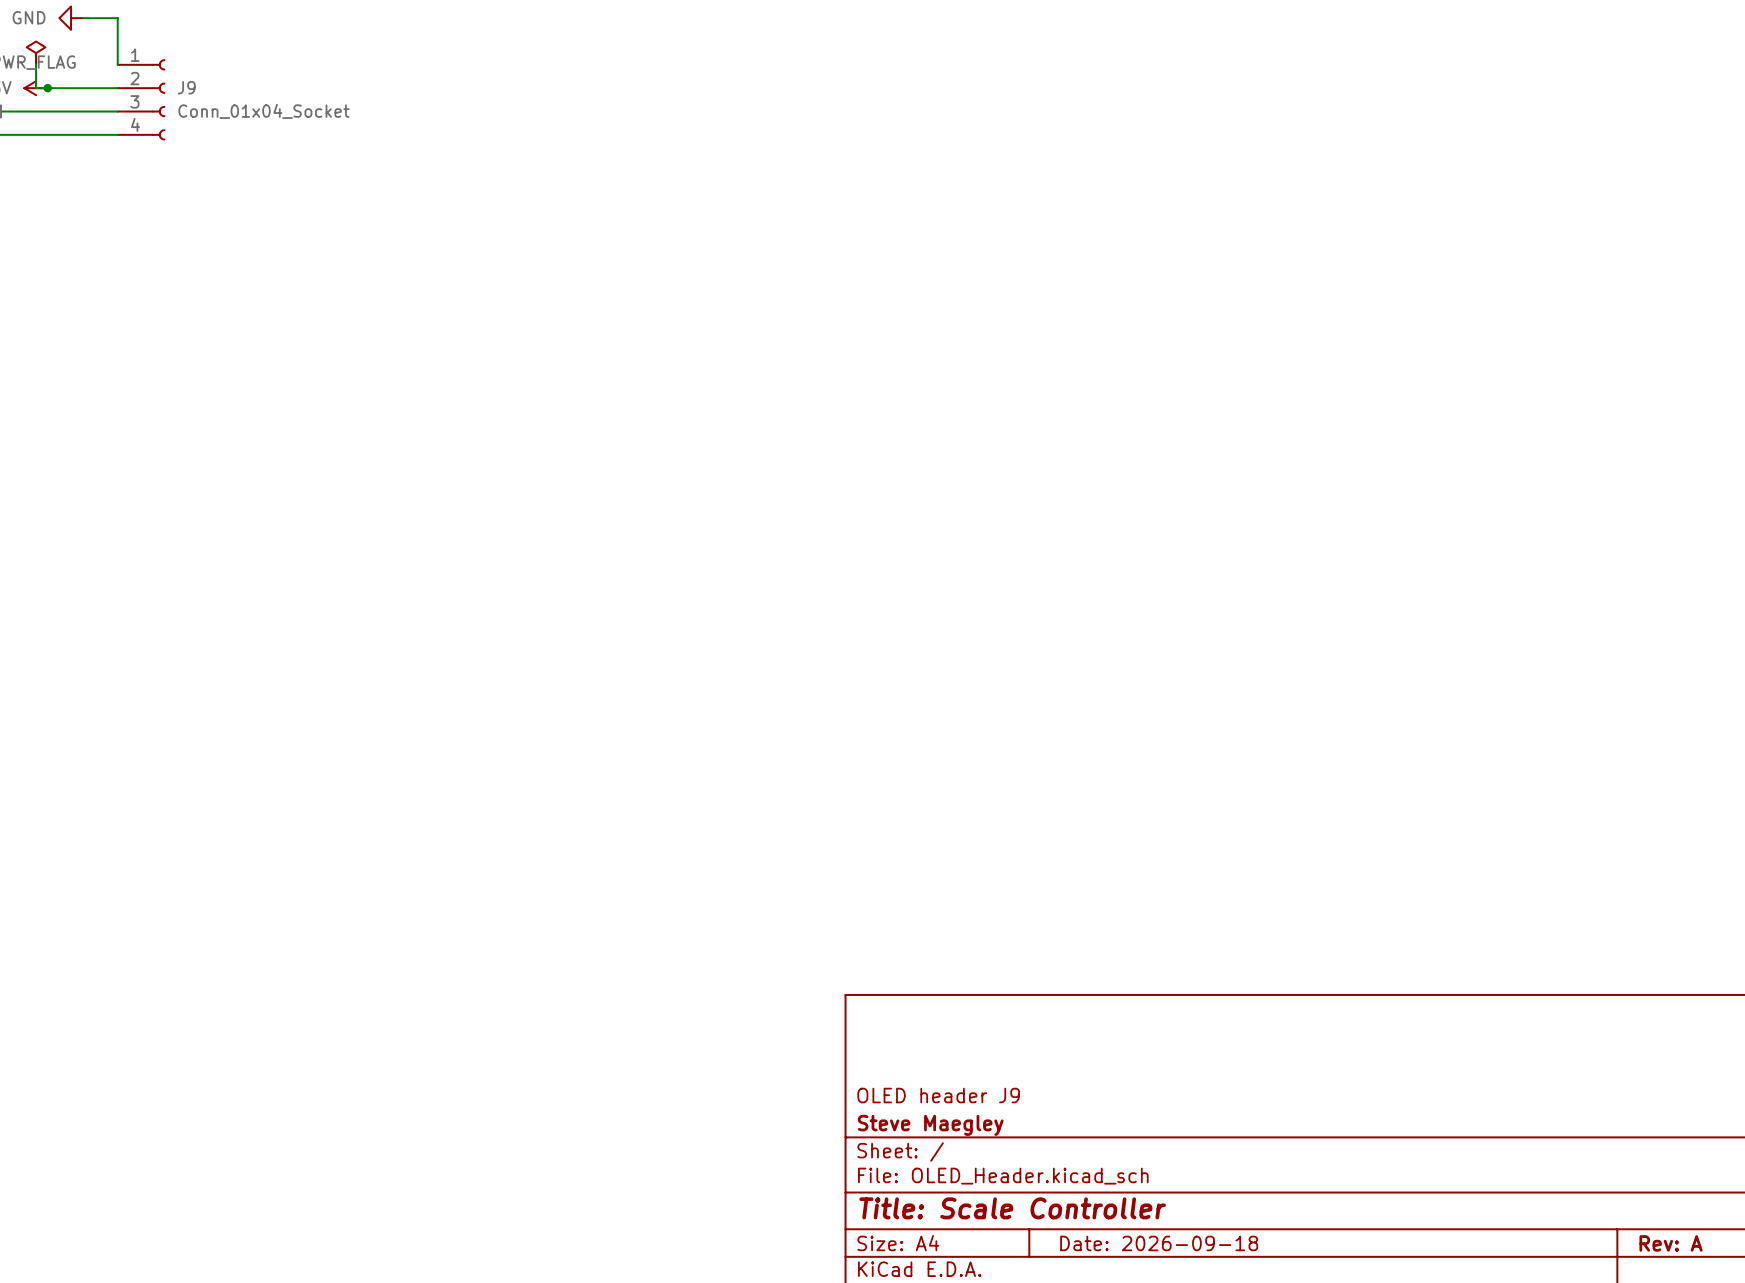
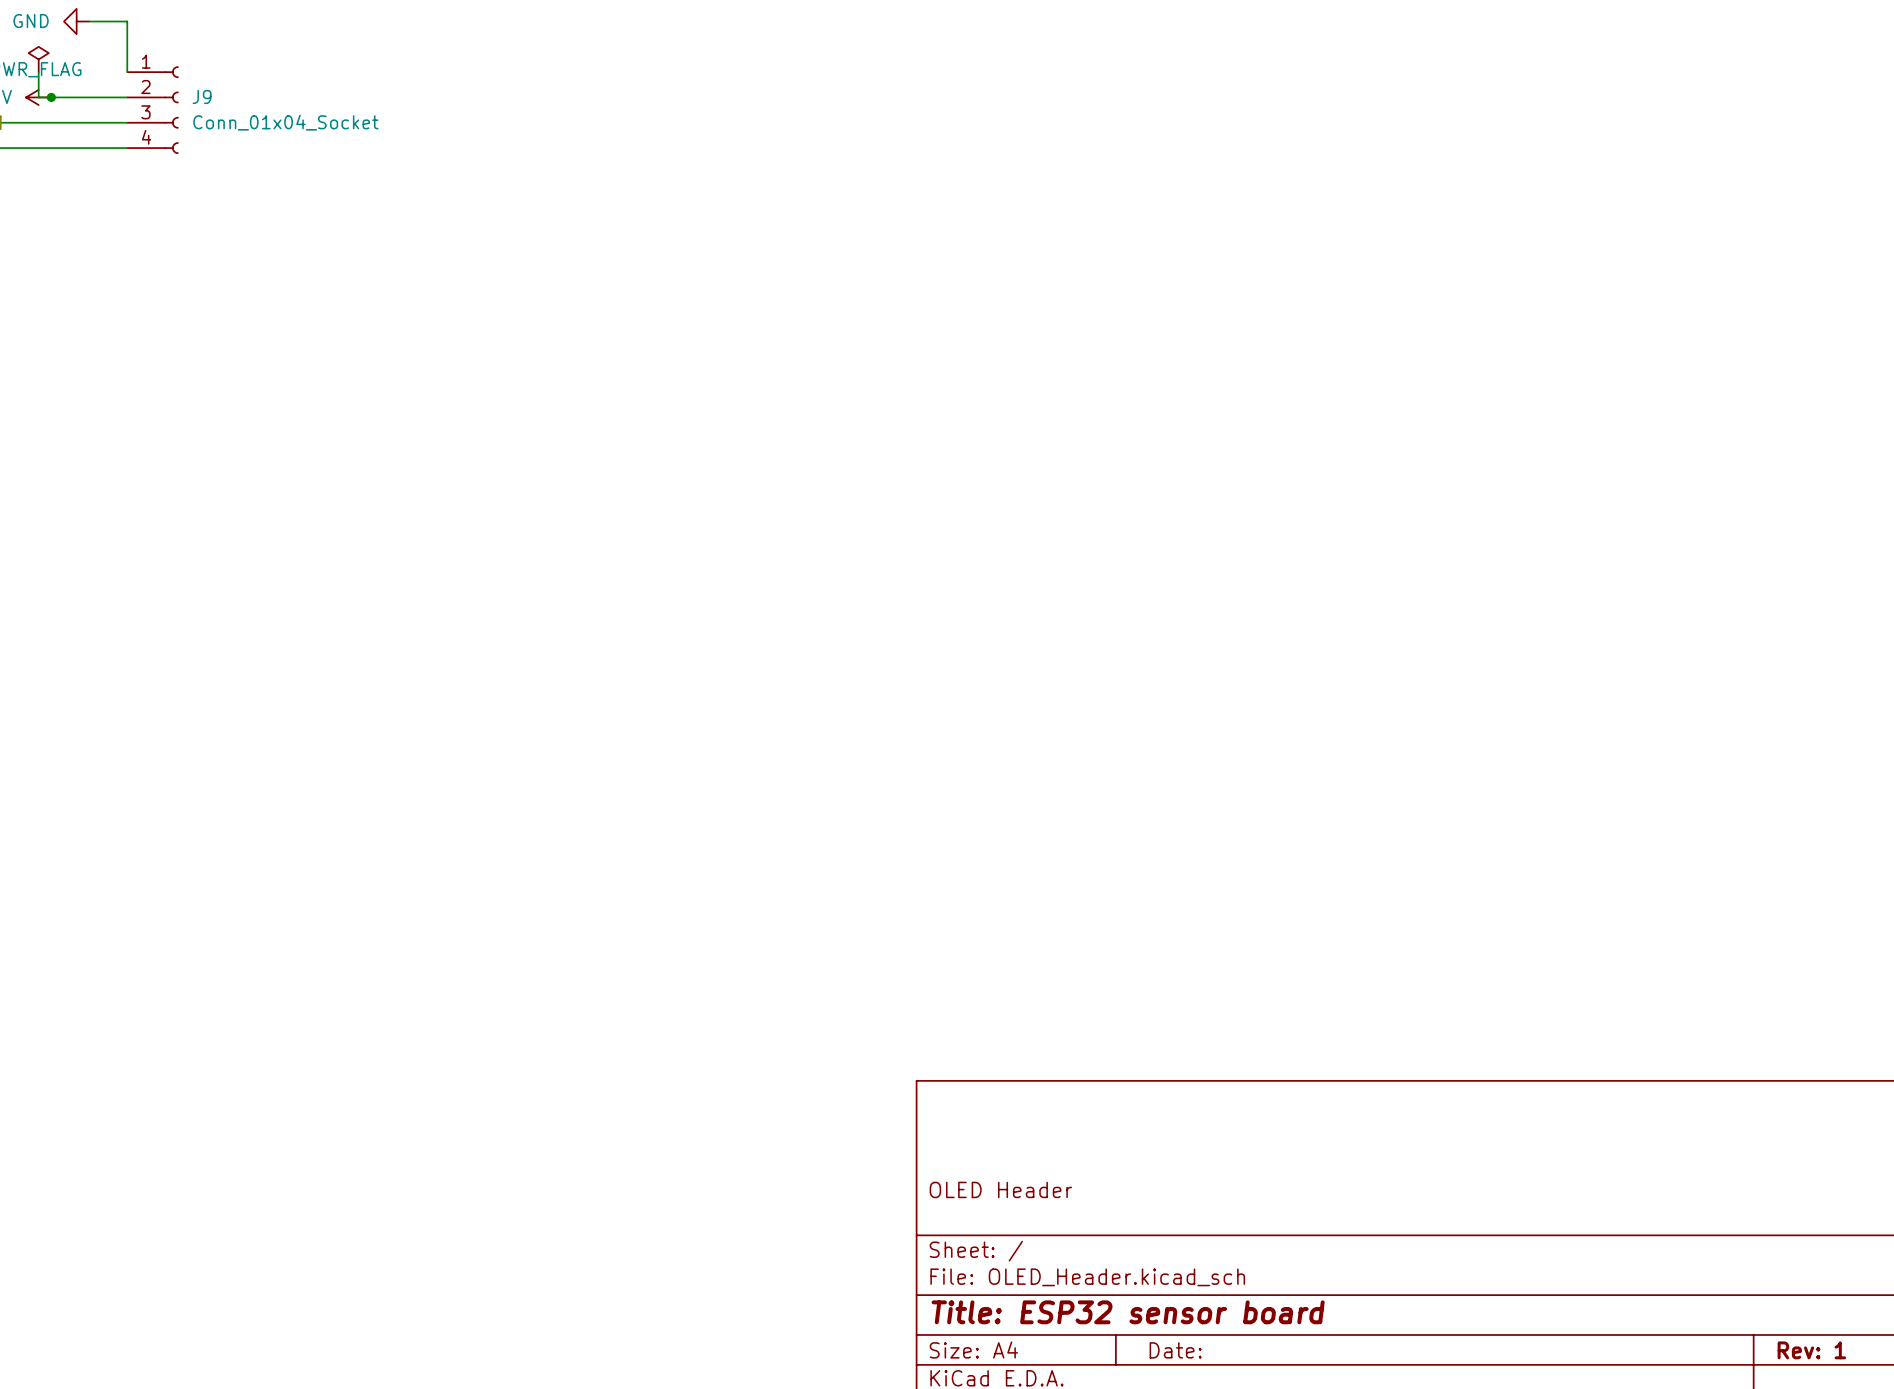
title block: OLED header J9 (938, 1095) -> OLED Header (1000, 1189)
title block: Steve Maegley (930, 1125) -> none
title block: Title: Scale Controller (1012, 1208) -> Title: ESP32 sensor board (1128, 1312)
title block: Date: 2026-09-18 (1159, 1243) -> Date: (1175, 1350)
title block: Rev: A (1671, 1243) -> Rev: 1 (1811, 1350)

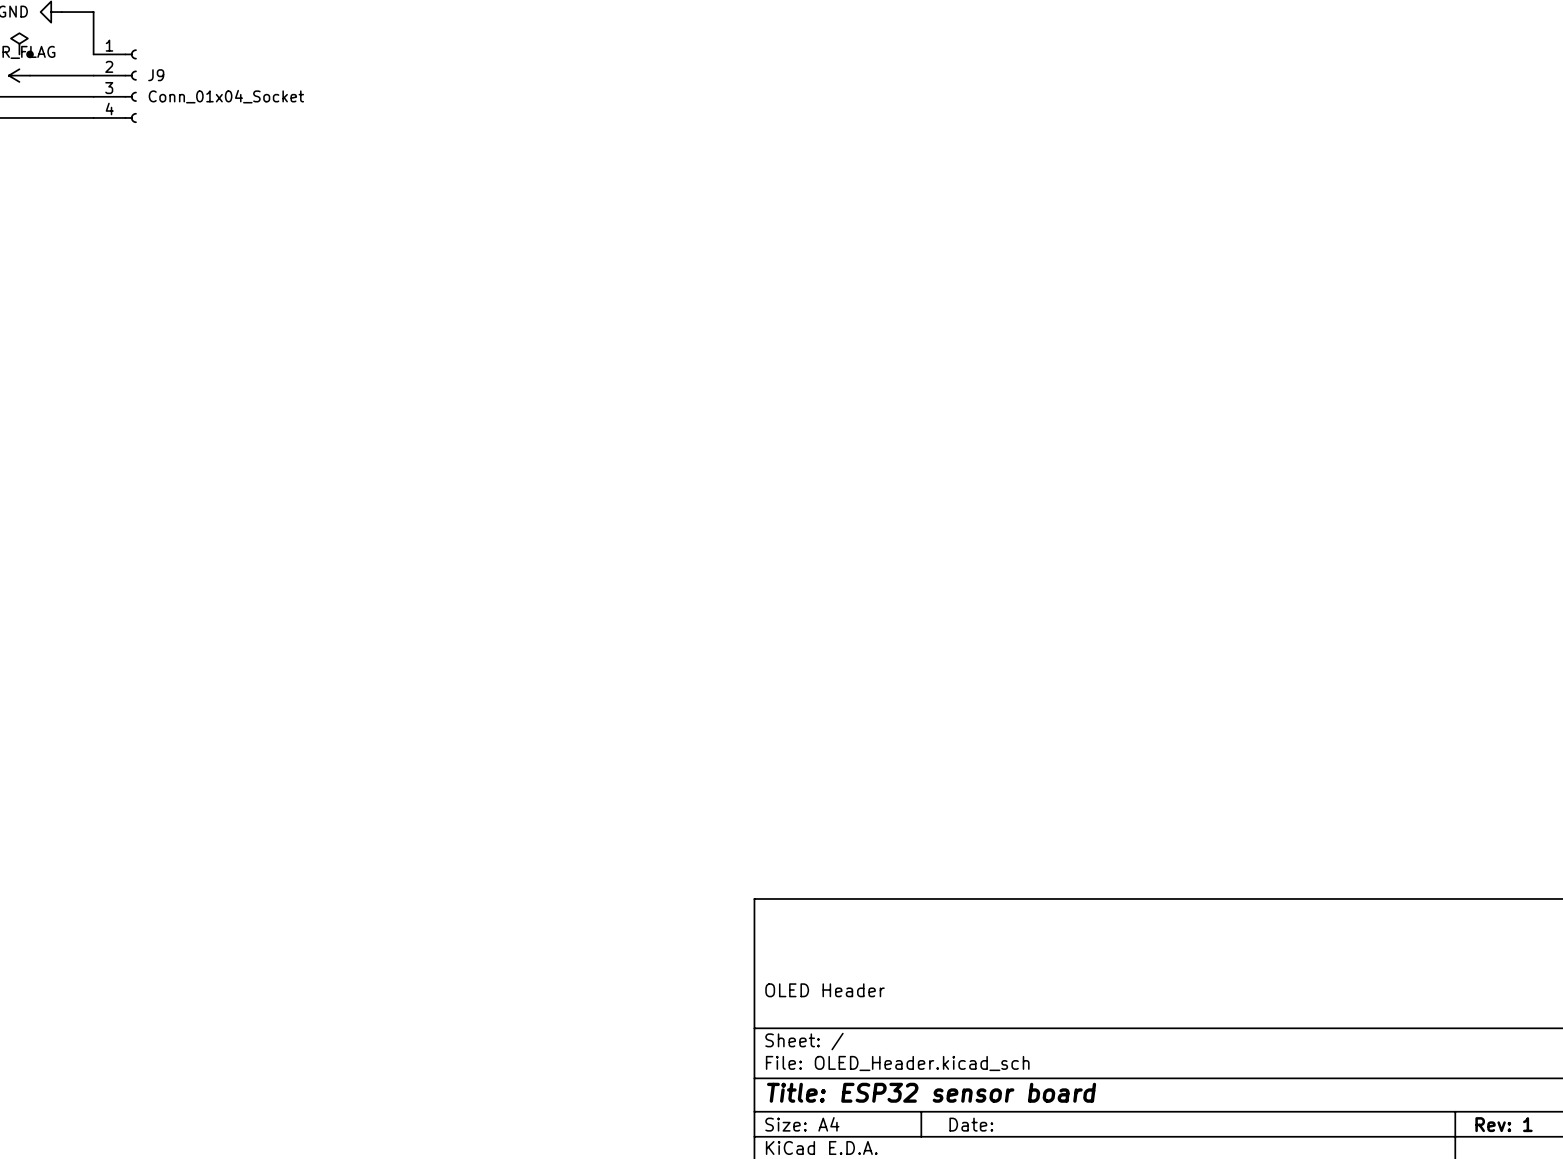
wire: (38, 72) (38, 97) (51, 97) -> none
junction position: (51, 97) -> (30, 54)

